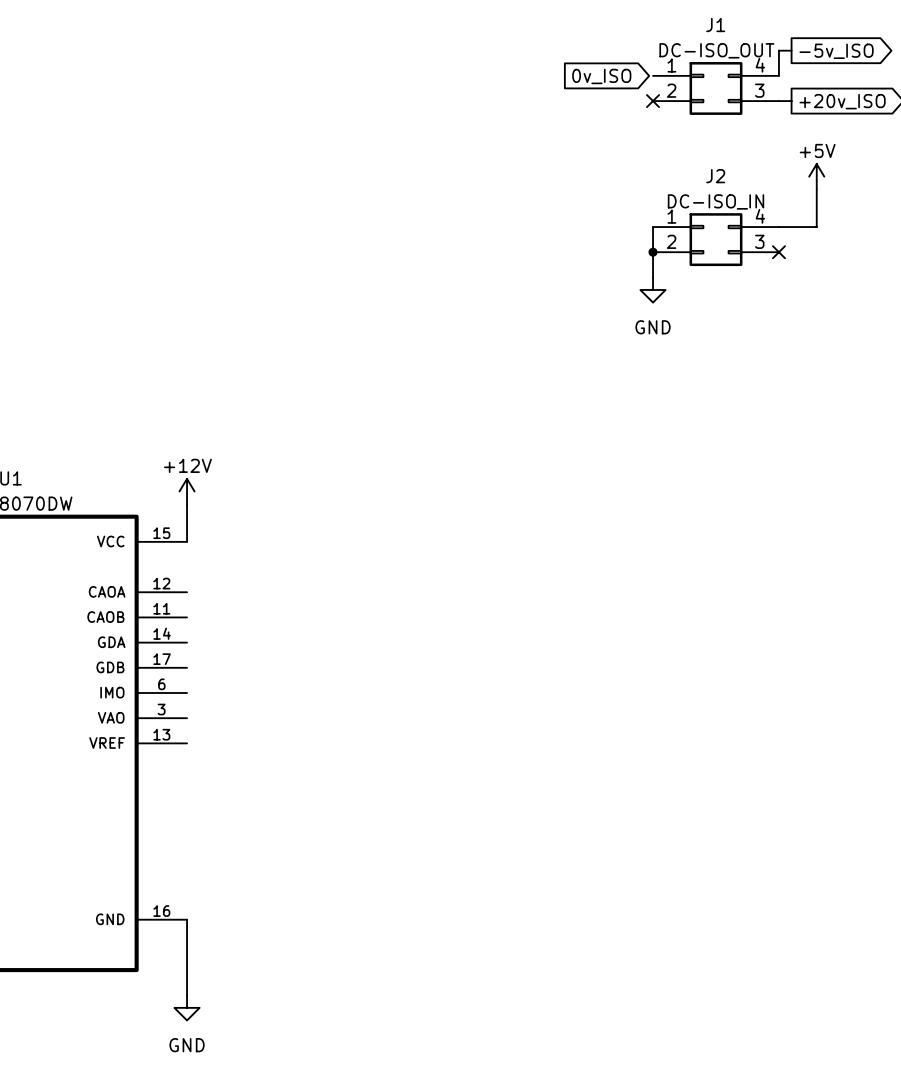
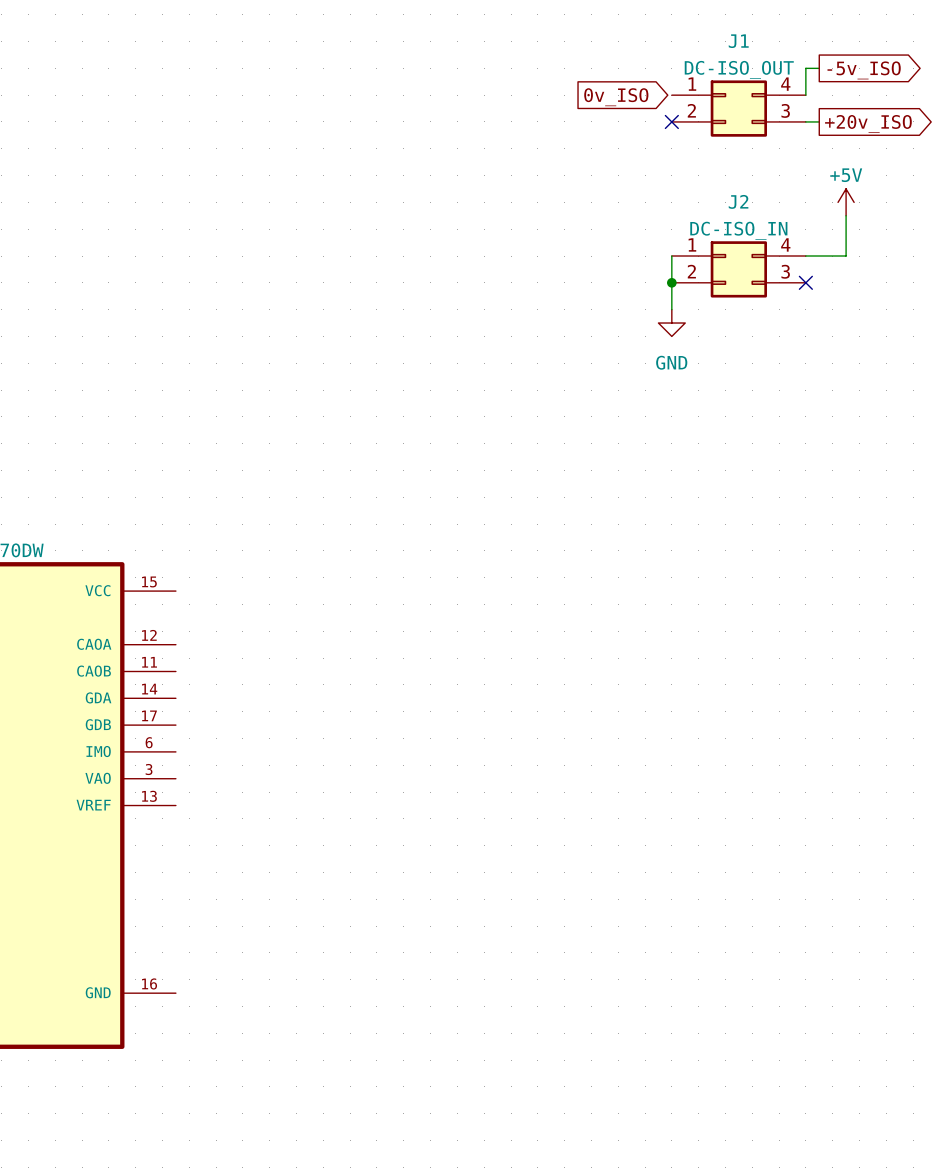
power symbol: +12V (187, 491) -> none
wire: (187, 504) (187, 541) -> none
wire: (187, 919) (187, 995) -> none
power symbol: GND (187, 1007) -> none

